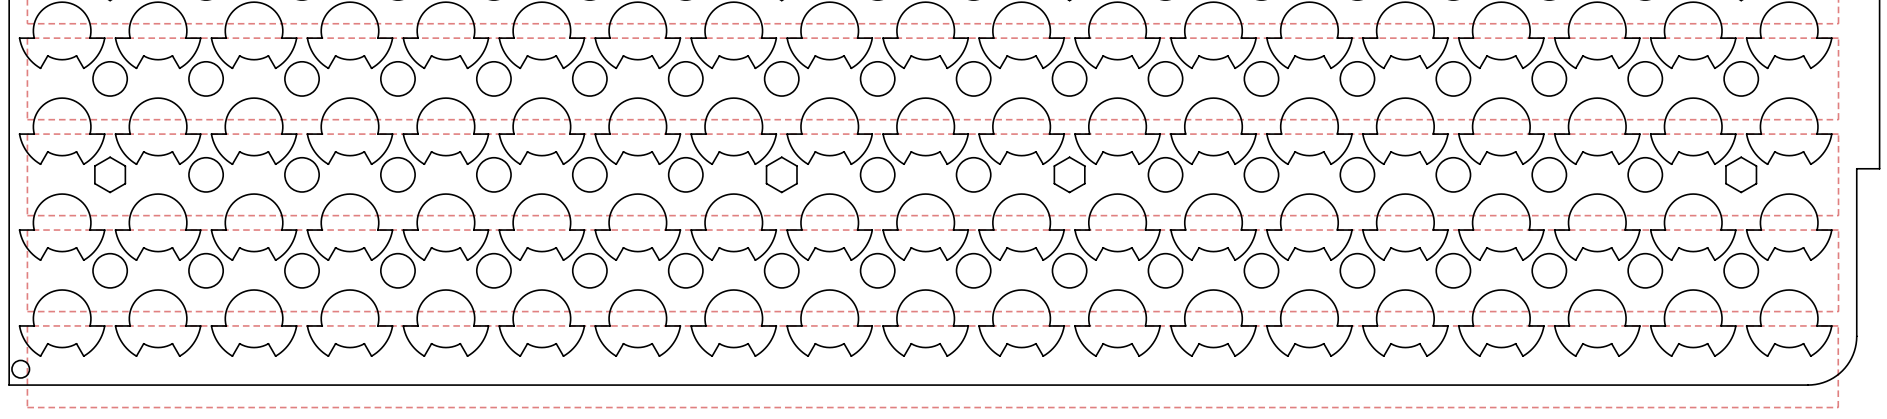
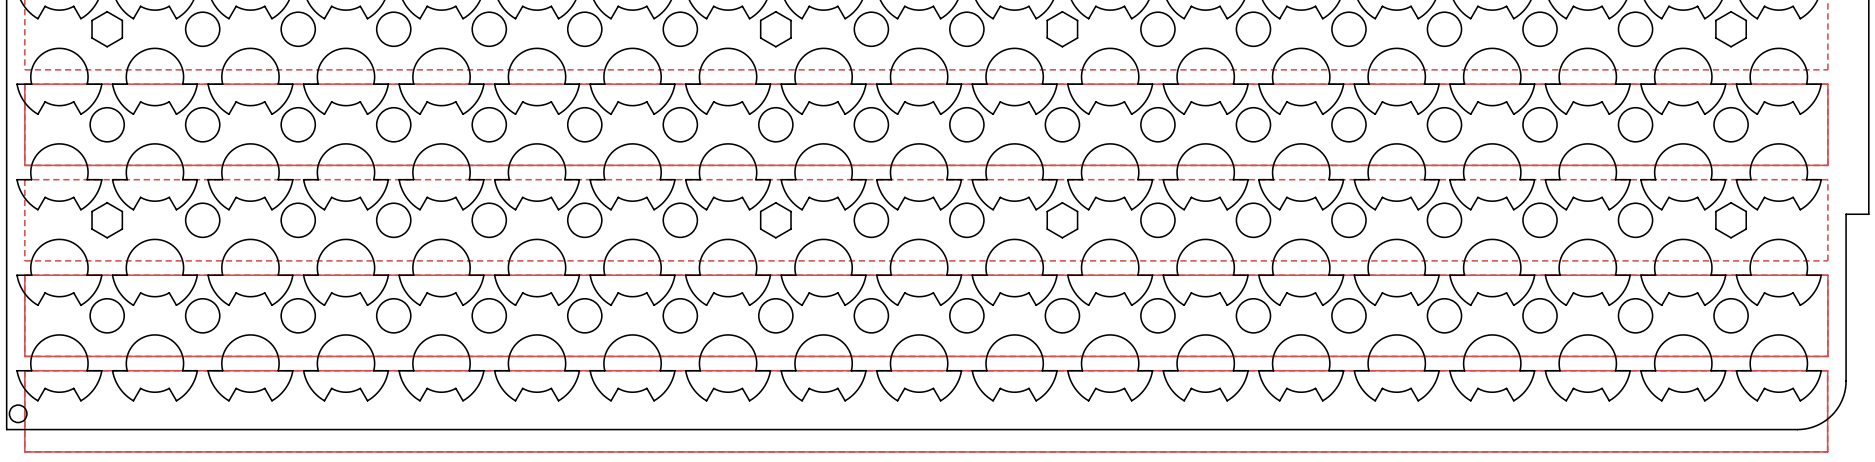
track: none -> (24, 84) (24, 165) (1827, 165) (1827, 84) (24, 84)
track: none -> (24, 275) (1827, 275) (1827, 356) (24, 356) (24, 275)
track: none -> (24, 370) (24, 451) (1827, 451) (1827, 370) (24, 370)

